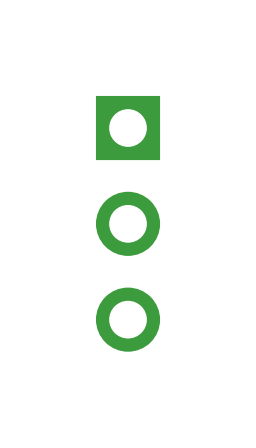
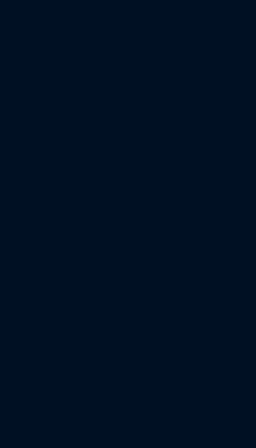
part: (128, 223) -> none

